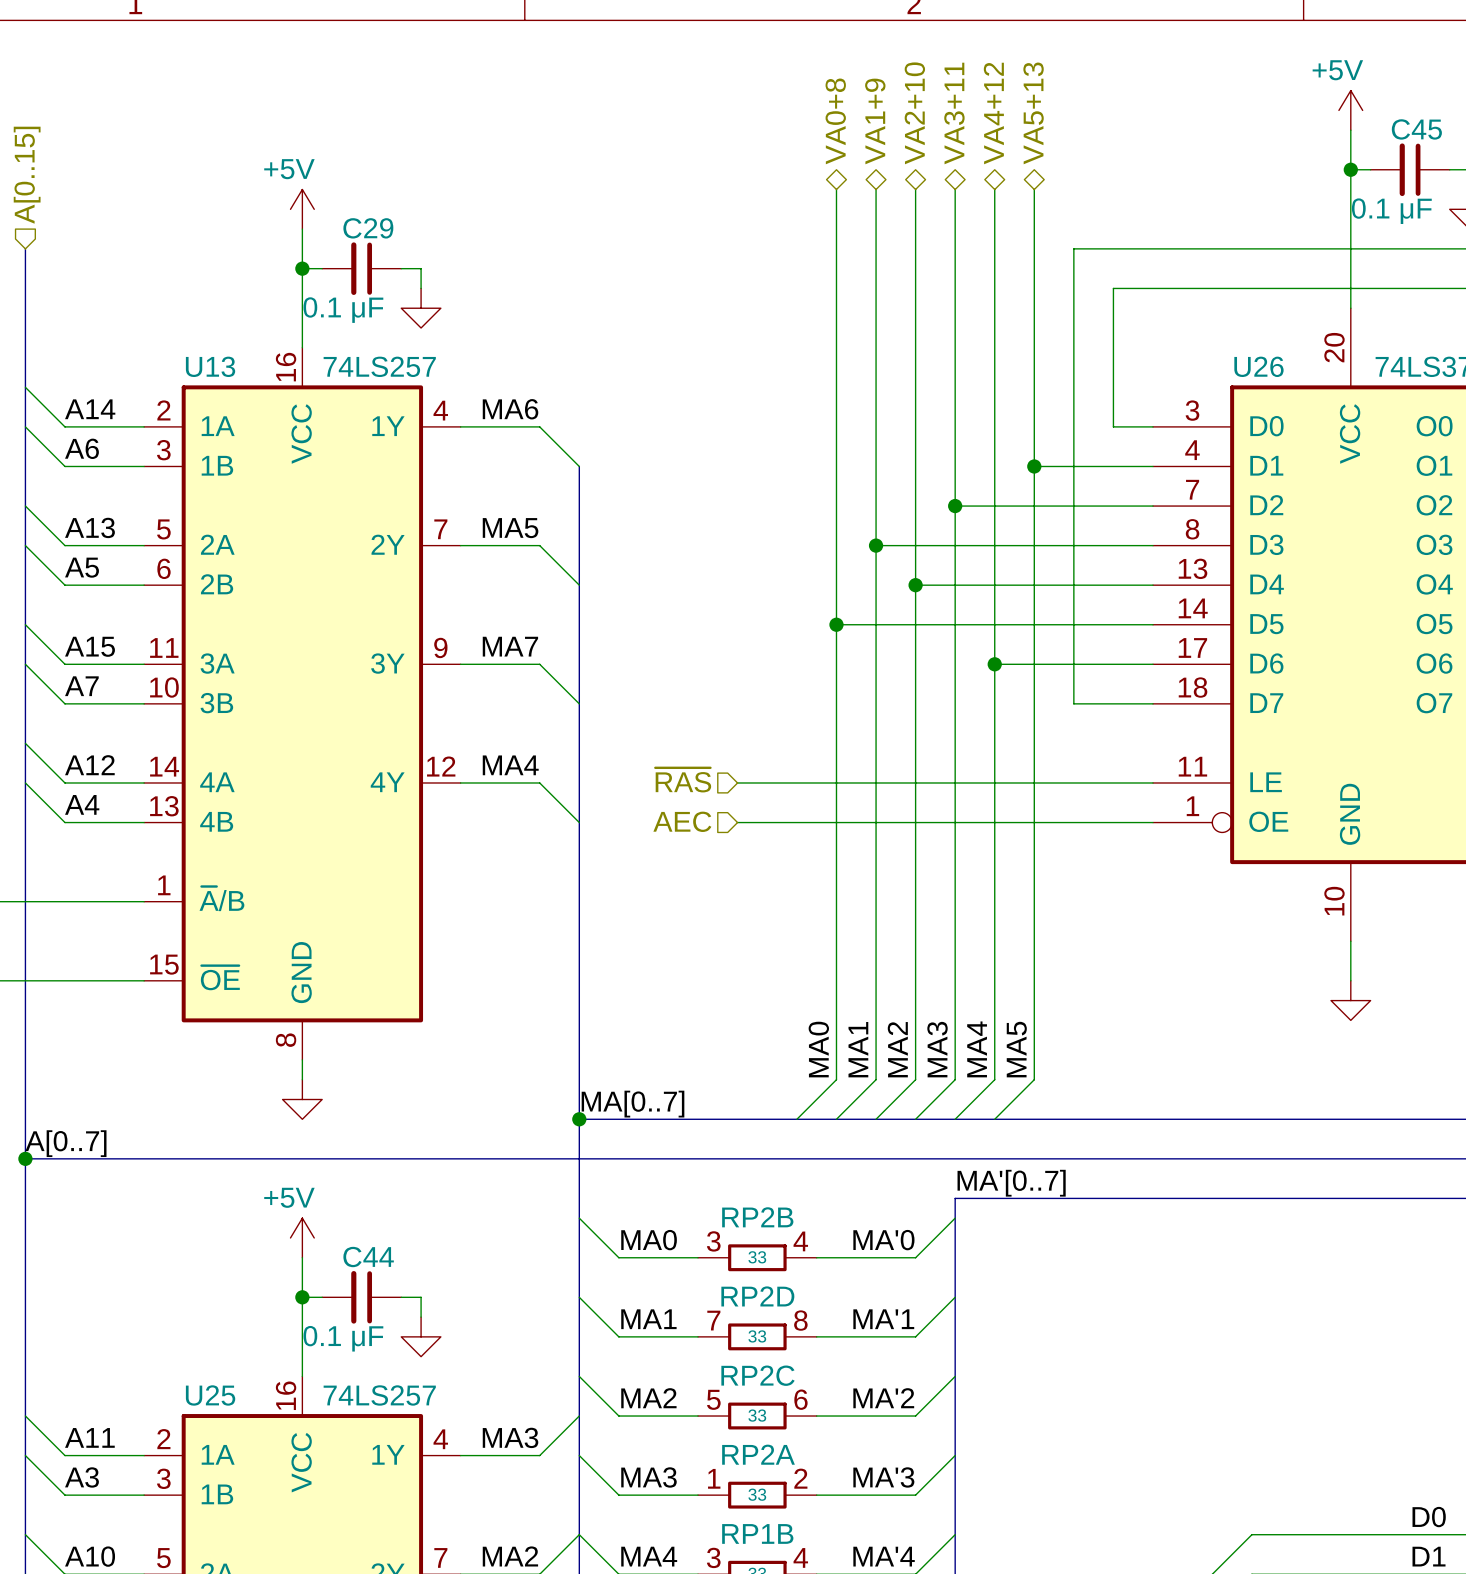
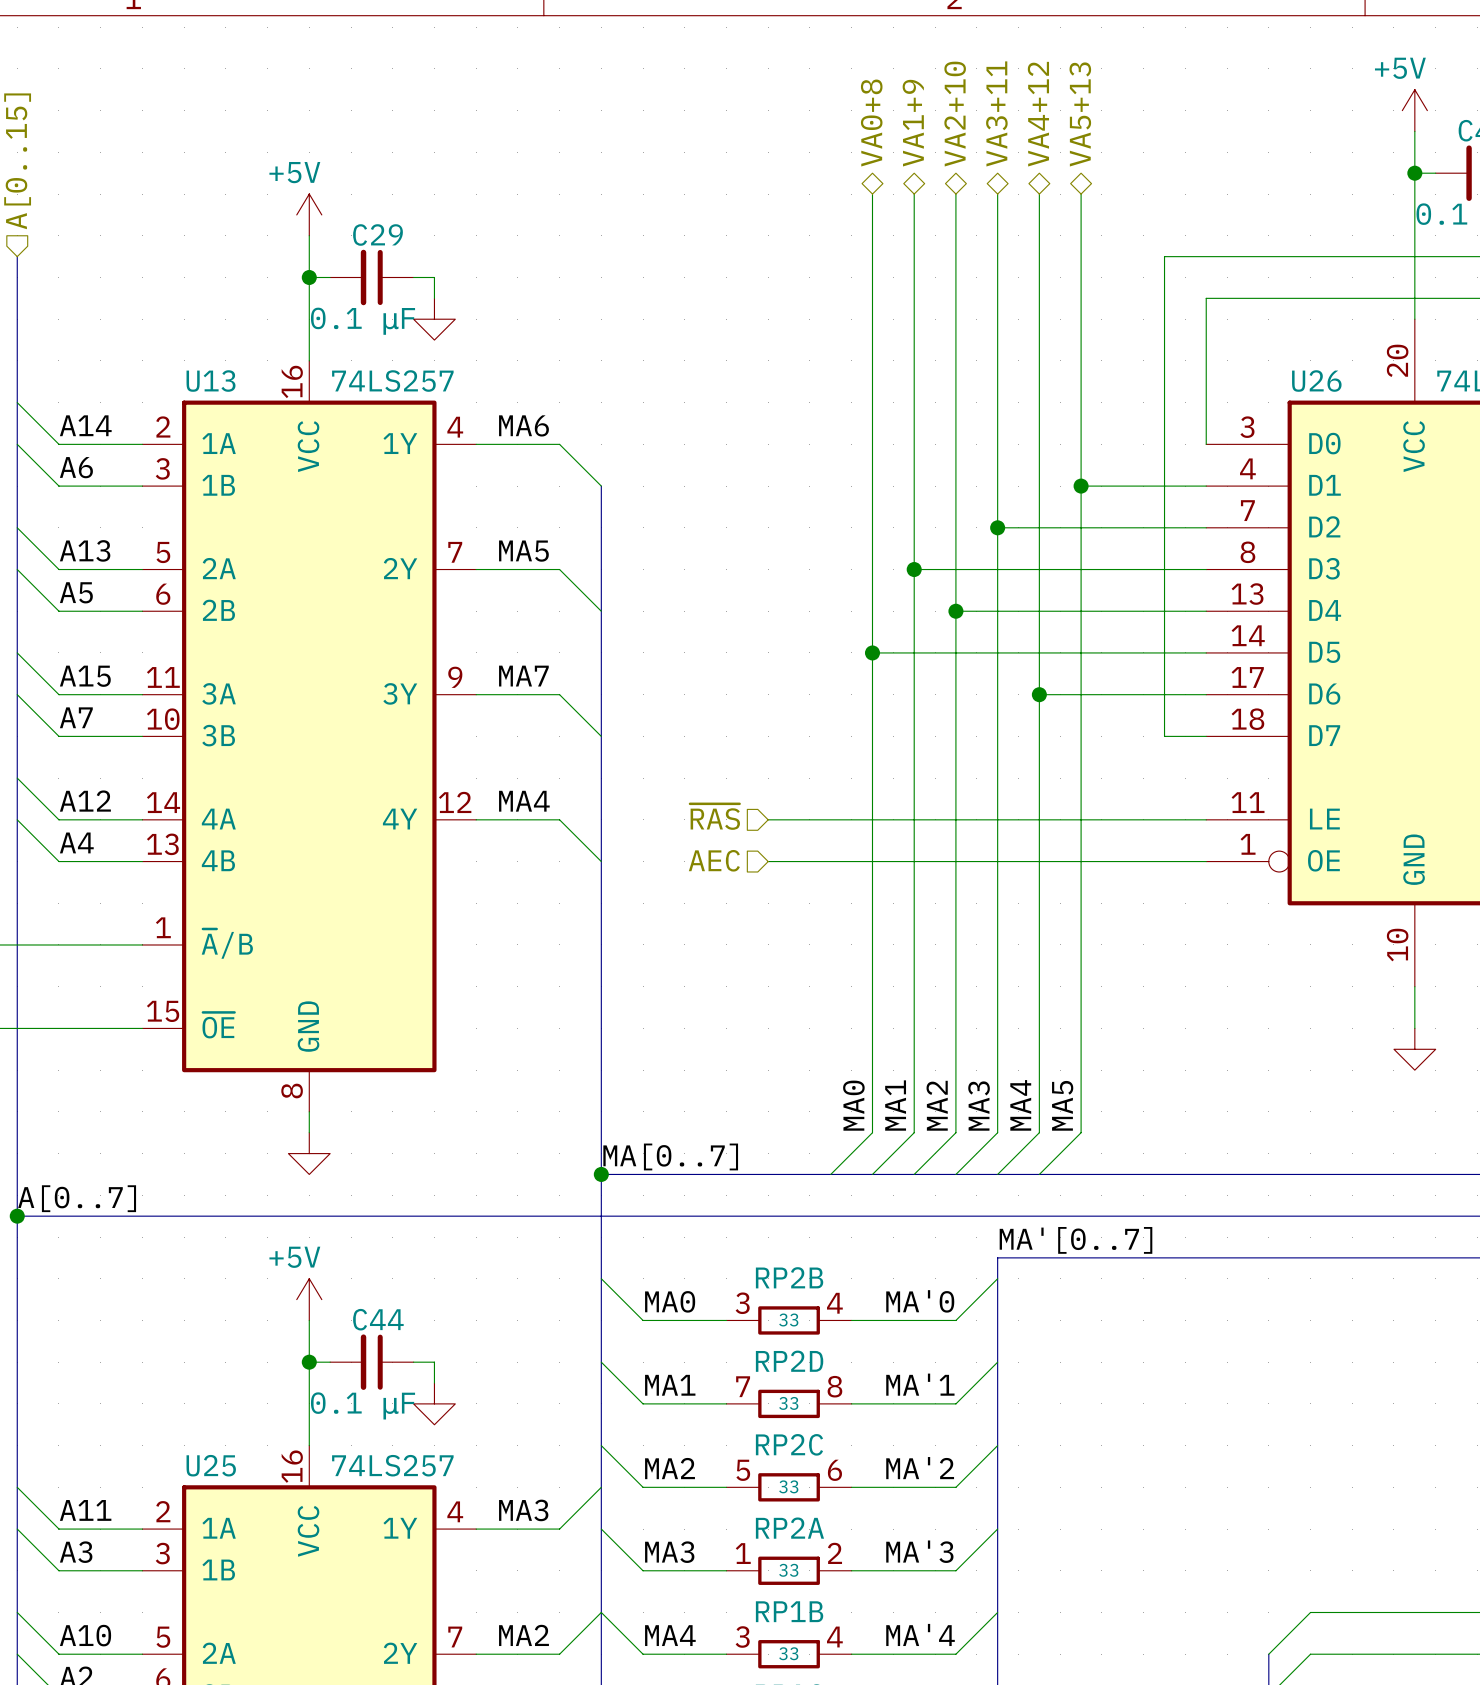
wire: (1113, 248) (1073, 248) (1073, 703) (1113, 703) -> (1164, 444) (1164, 736)
wire: (1113, 288) (1152, 288) -> (1164, 298) (1164, 256)
wire: (1113, 426) (1152, 426) -> (1206, 298) (1206, 444)

